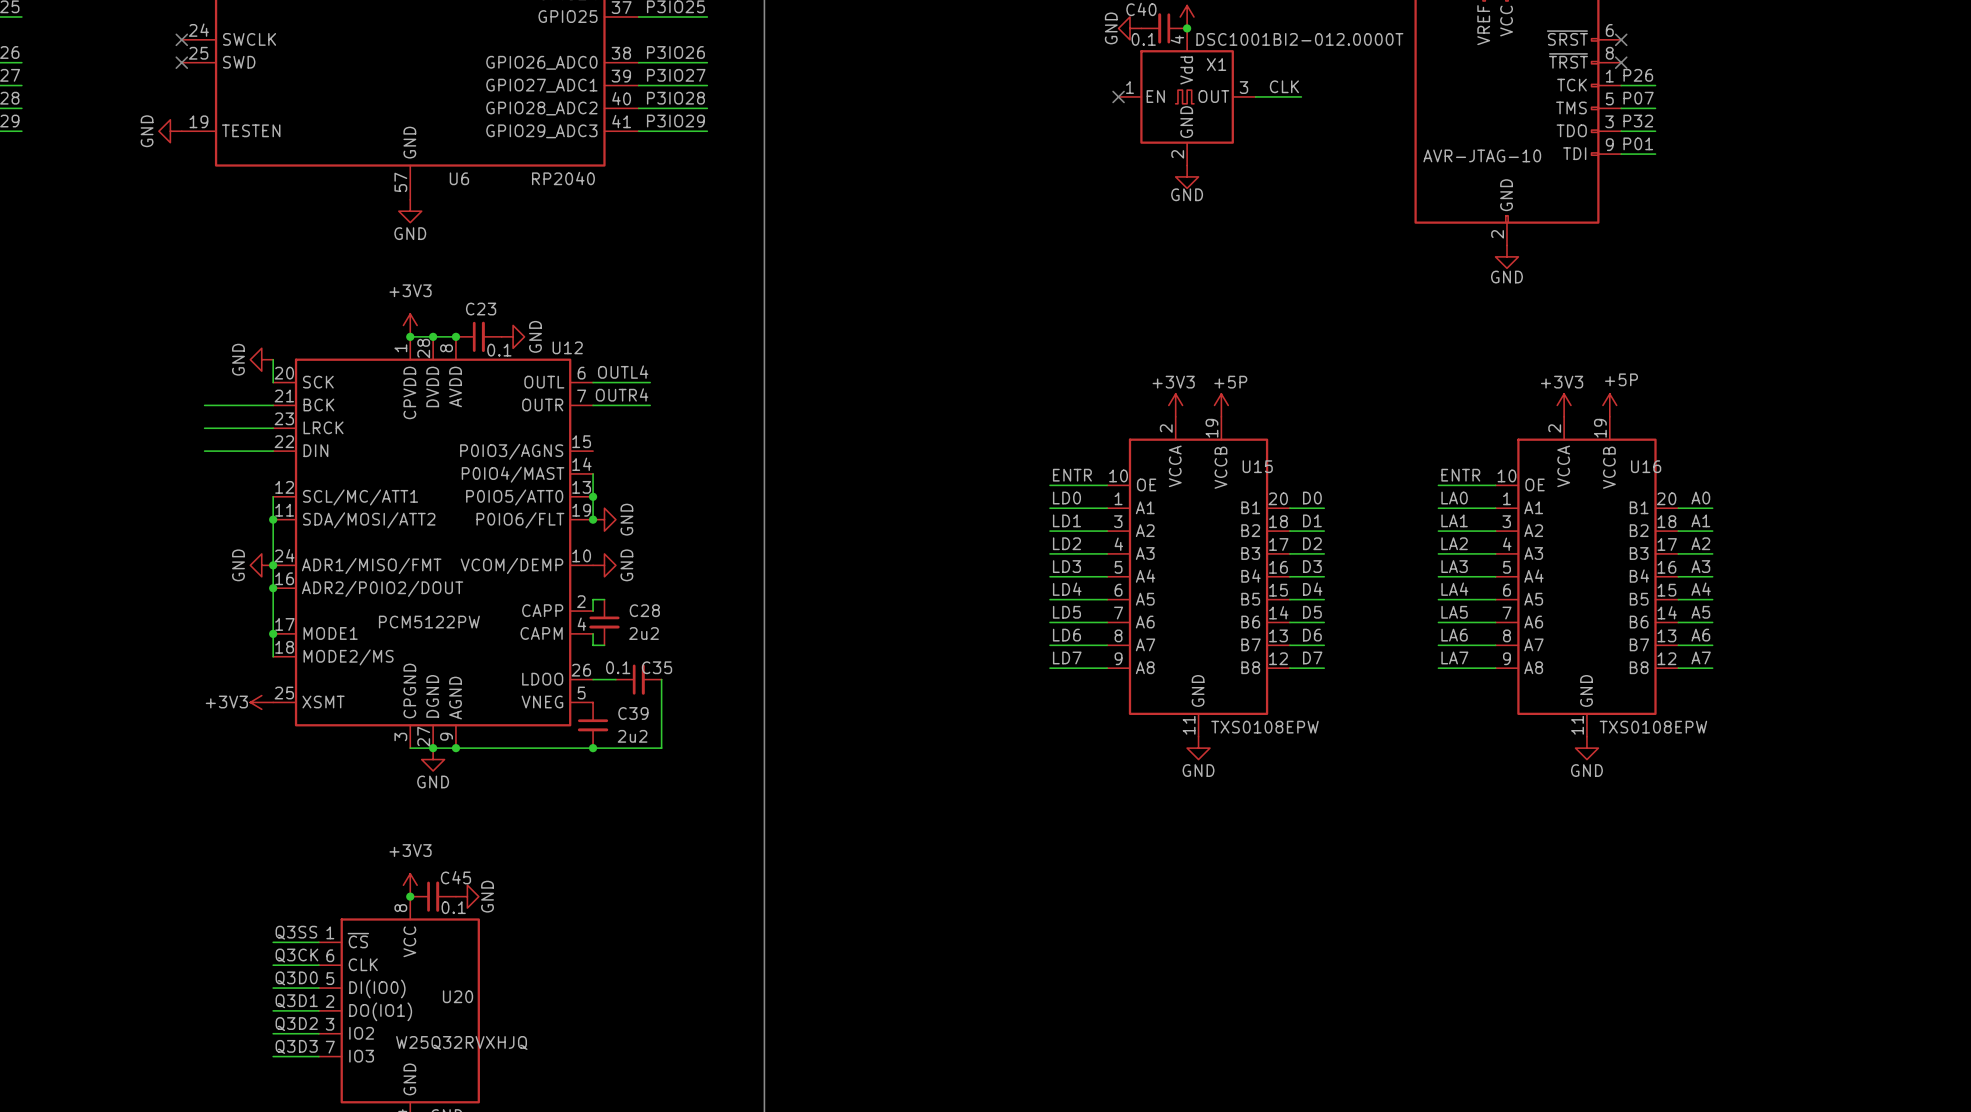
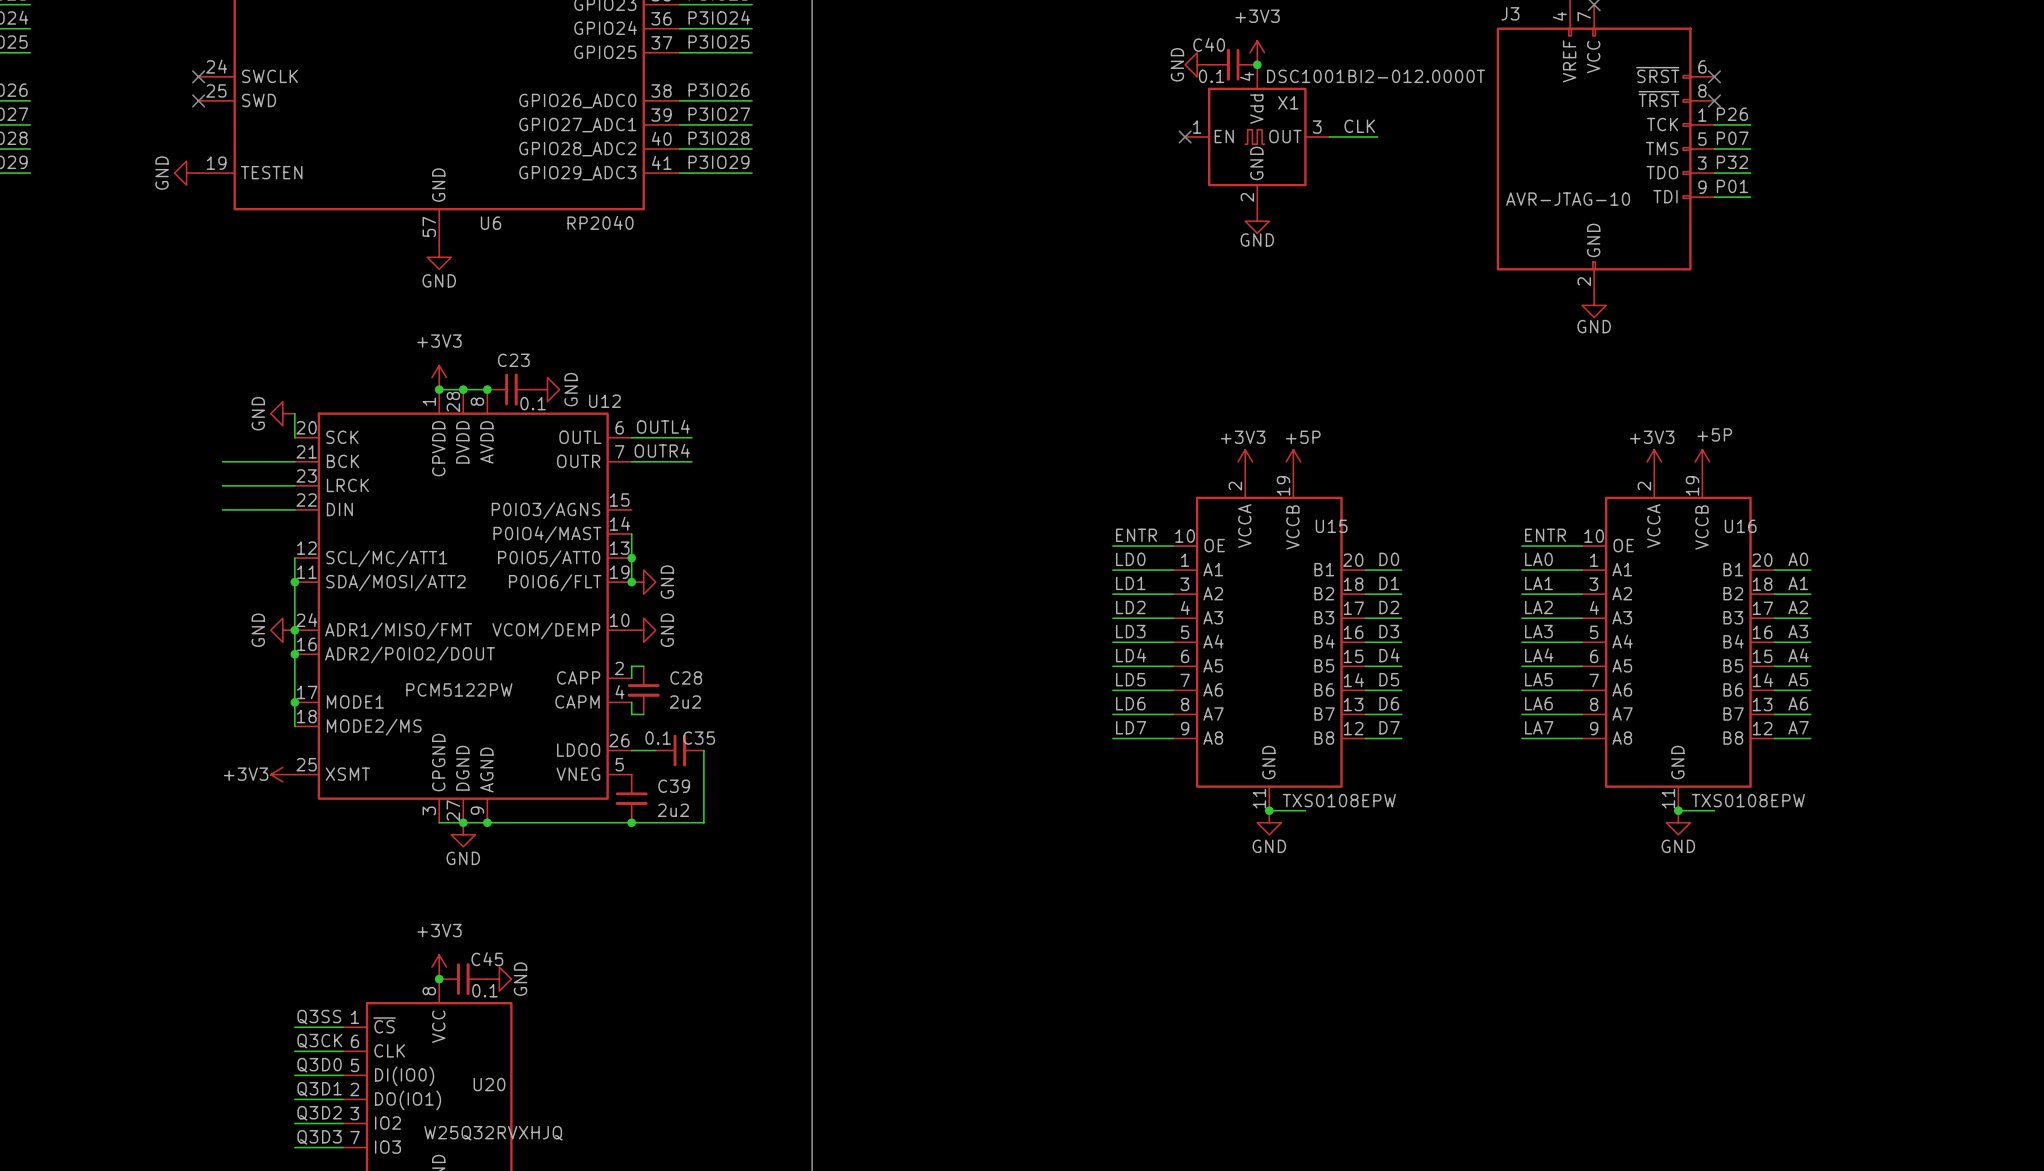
wire: none -> (1269, 810) (1305, 810)
junction: none -> (1269, 810)
wire: none -> (1678, 810) (1714, 810)
junction: none -> (1678, 810)

